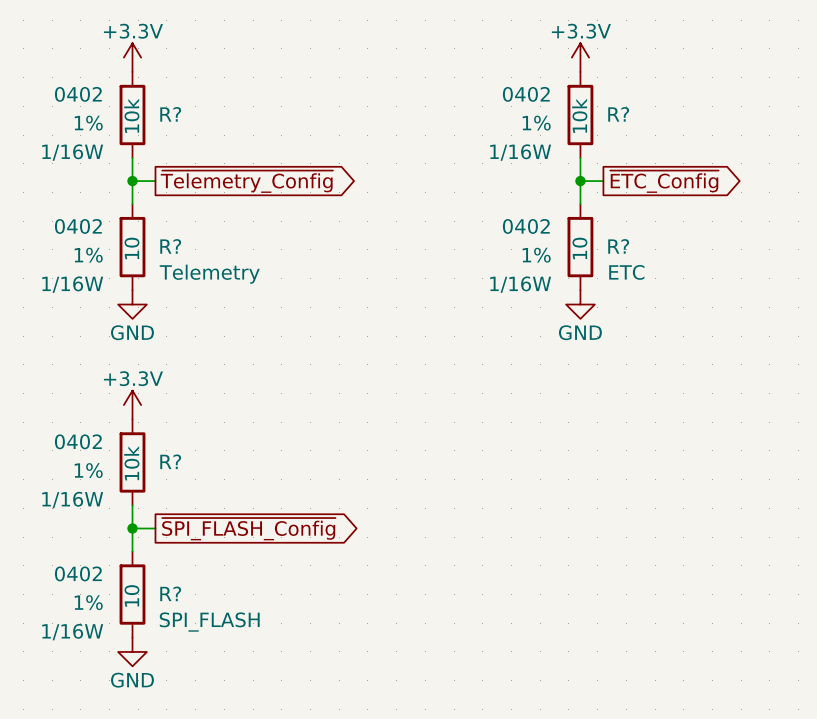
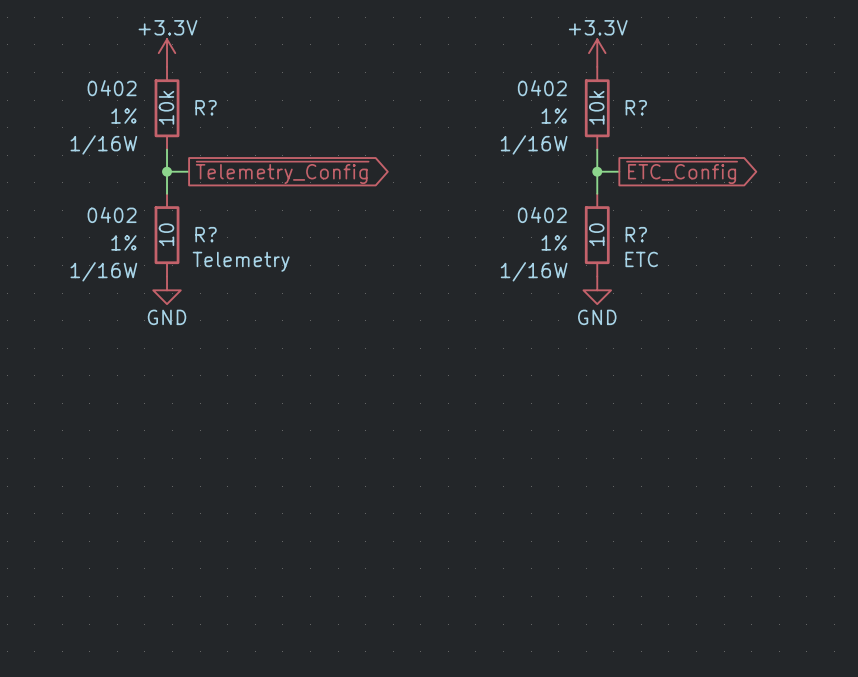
power symbol: +3.3V (132, 405) -> none
R?: 10k (132, 462) -> none
wire: (132, 505) (132, 551) -> none
wire: (132, 528) (155, 528) -> none
junction: (132, 528) -> none
global label: ~{SPI_FLASH_Config} (248, 529) -> none
R?: 10 (132, 594) -> none
power symbol: GND (132, 651) -> none

